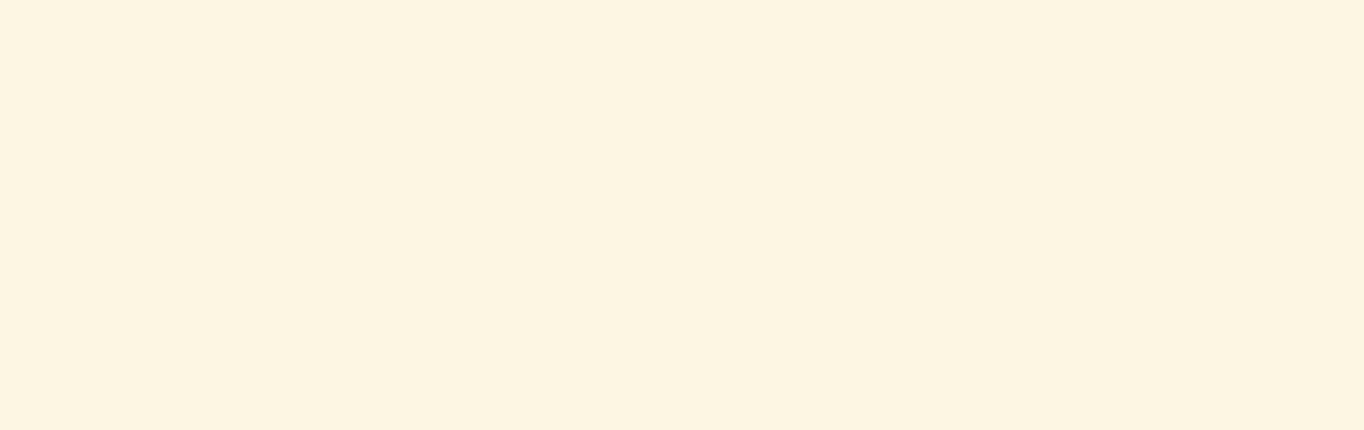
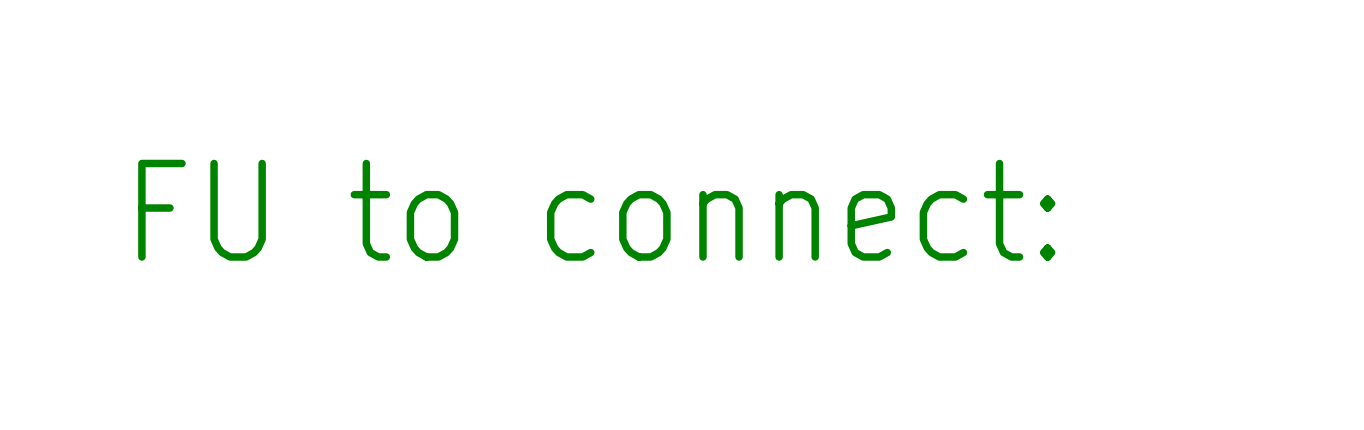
text: none -> FU to connect: (596, 210)

